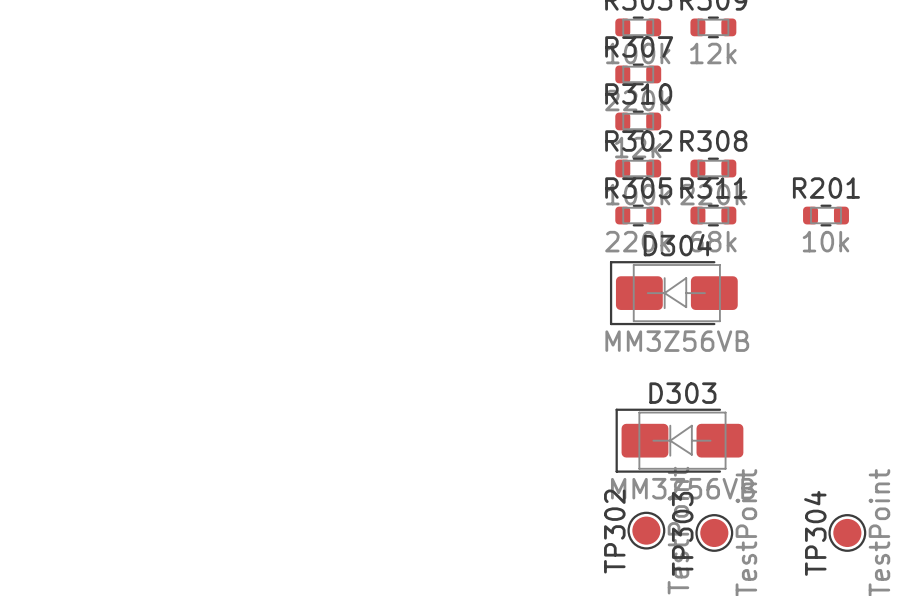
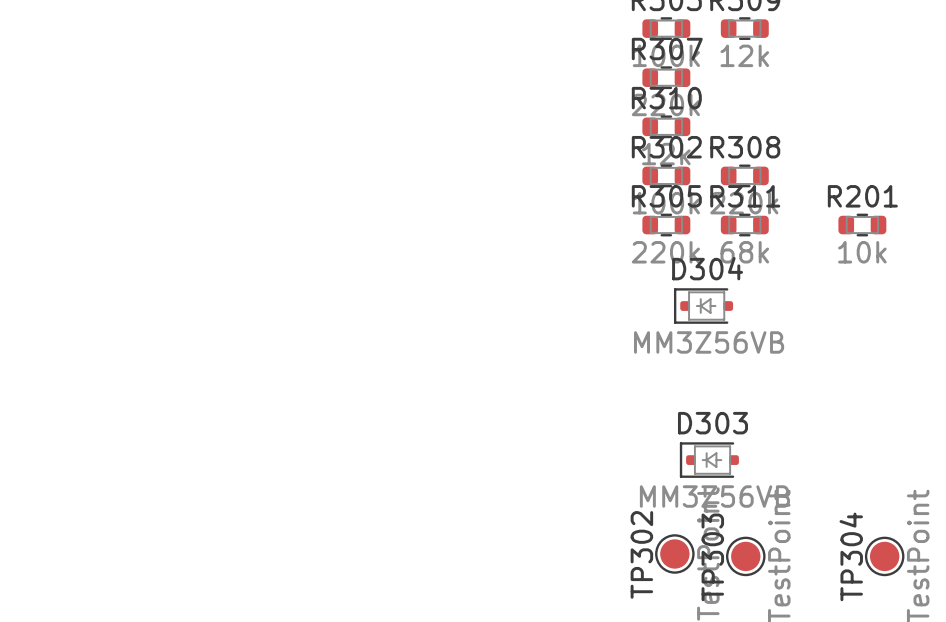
D304 footprint: [609, 261, 738, 326] -> [673, 288, 734, 324]
D303 footprint: [615, 408, 744, 473] -> [679, 442, 739, 478]

